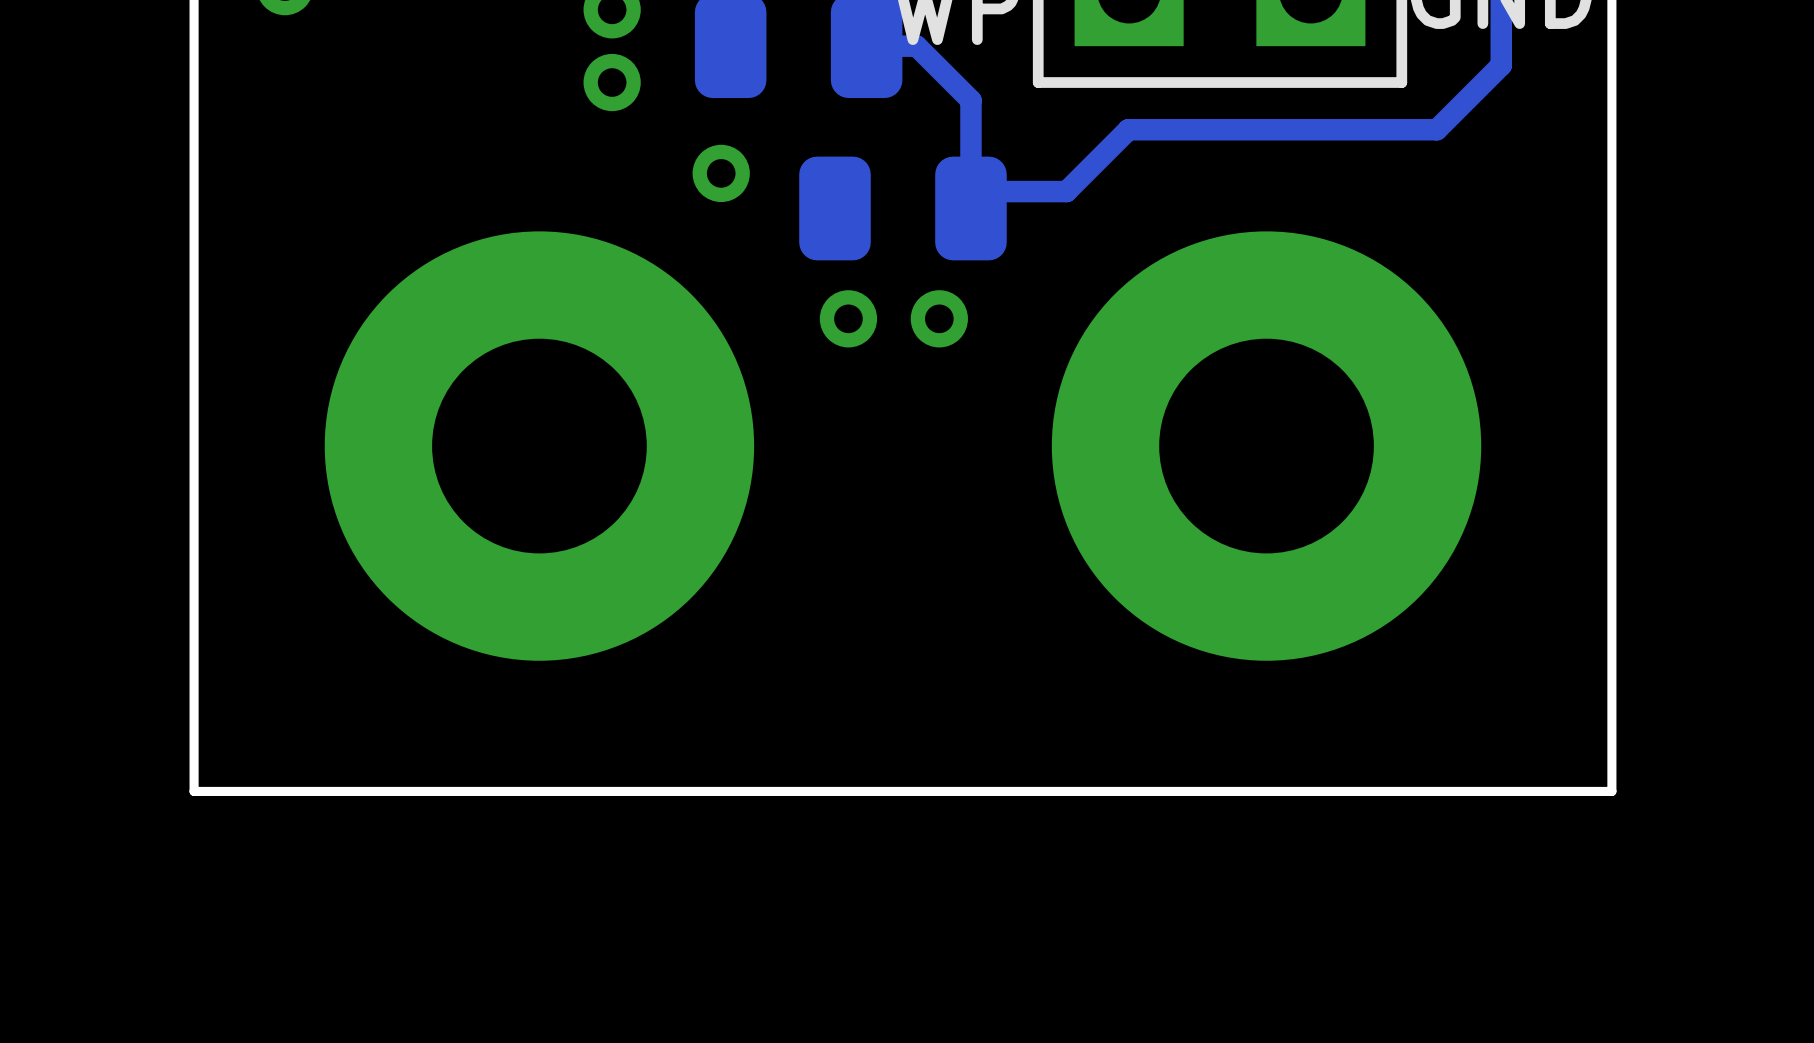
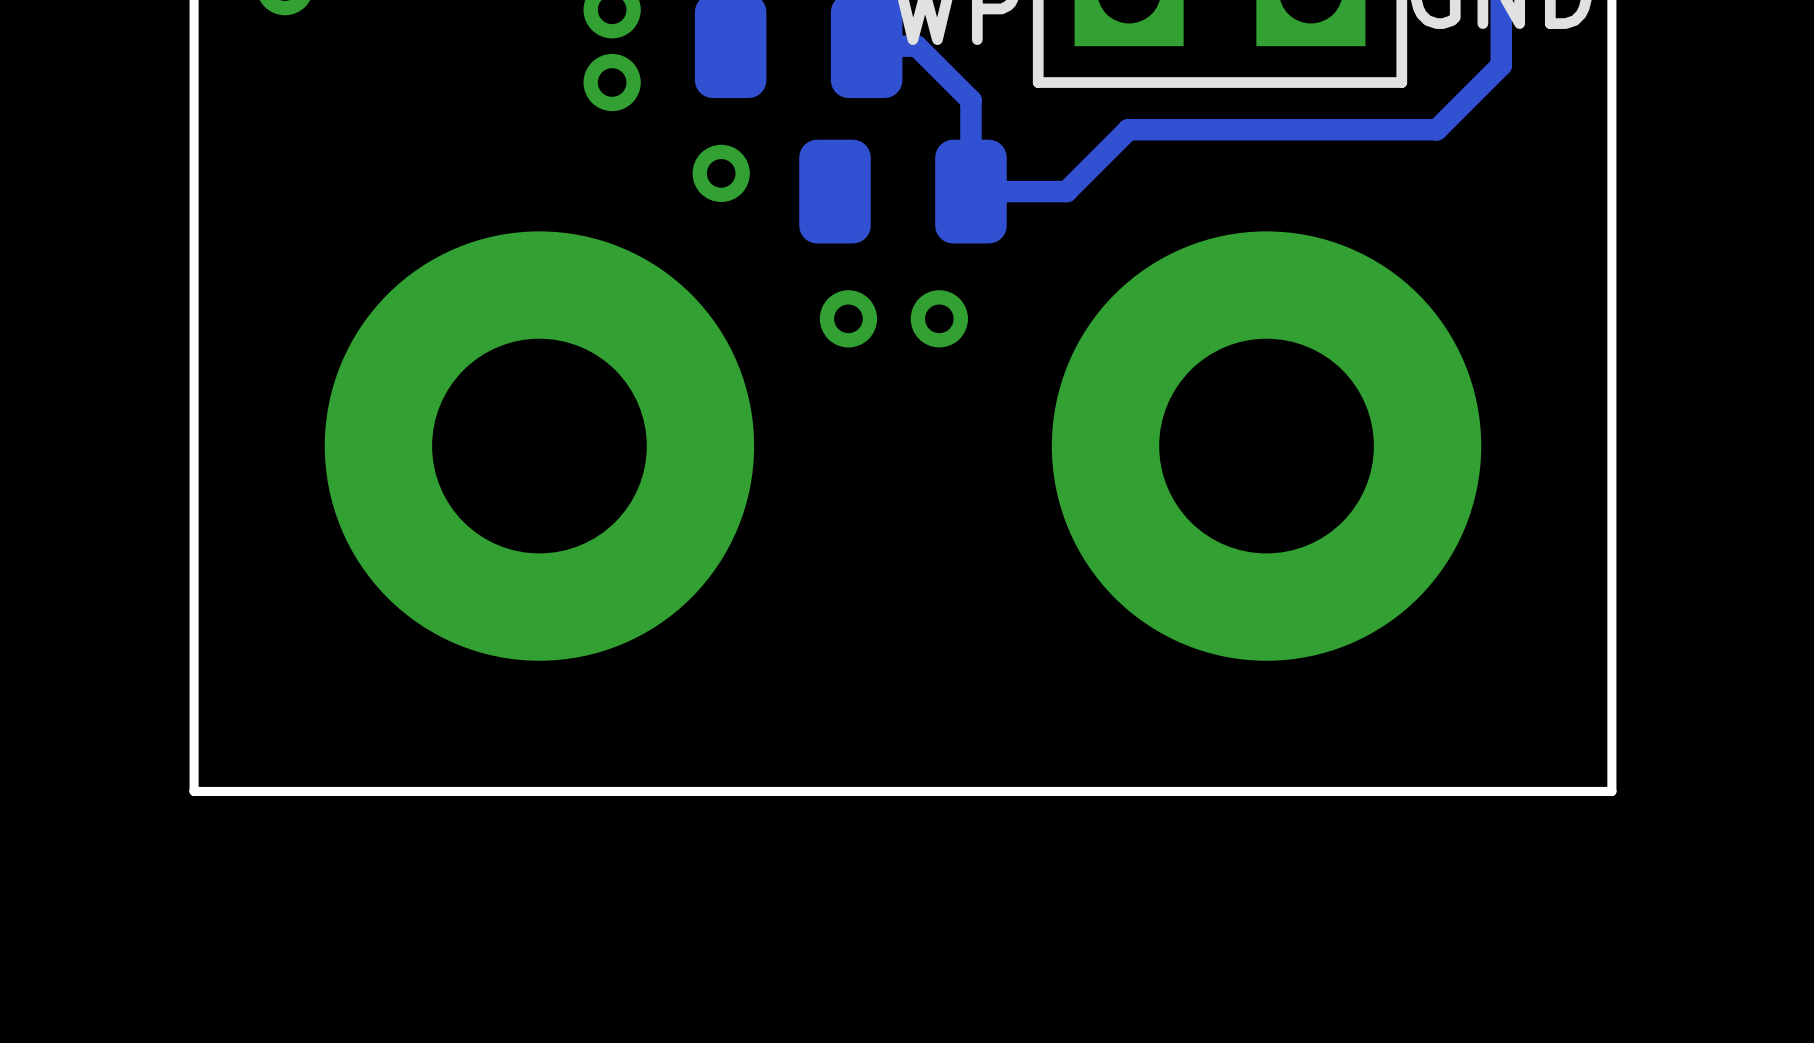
part position: (902, 208) -> (902, 191)

